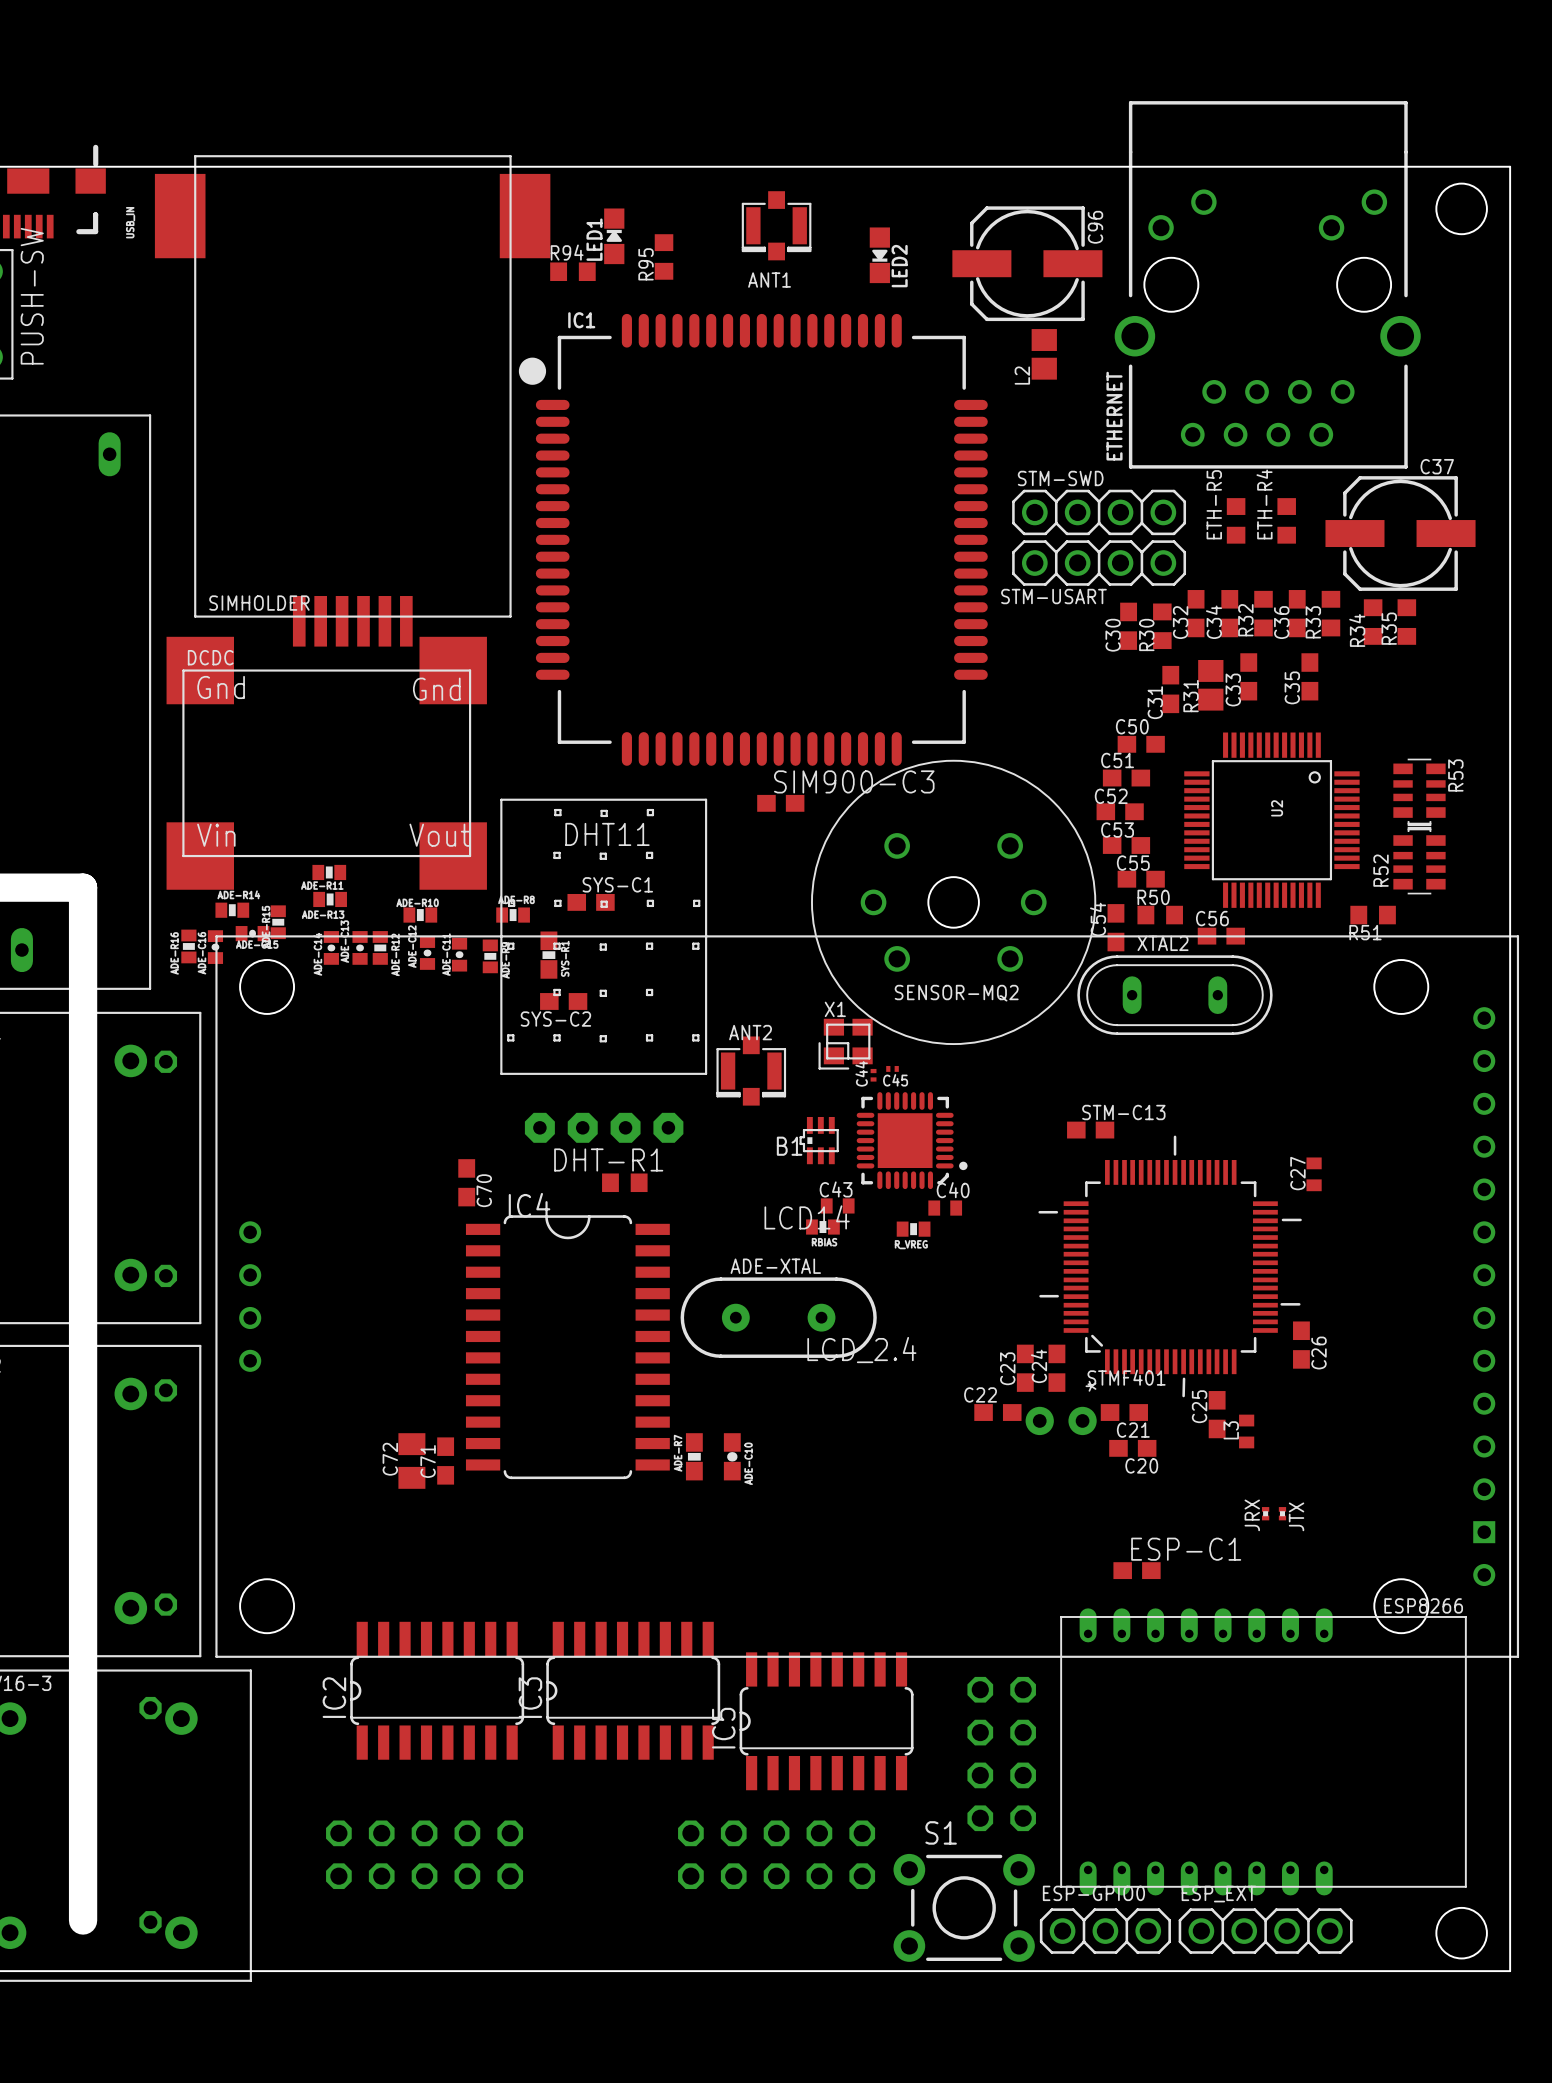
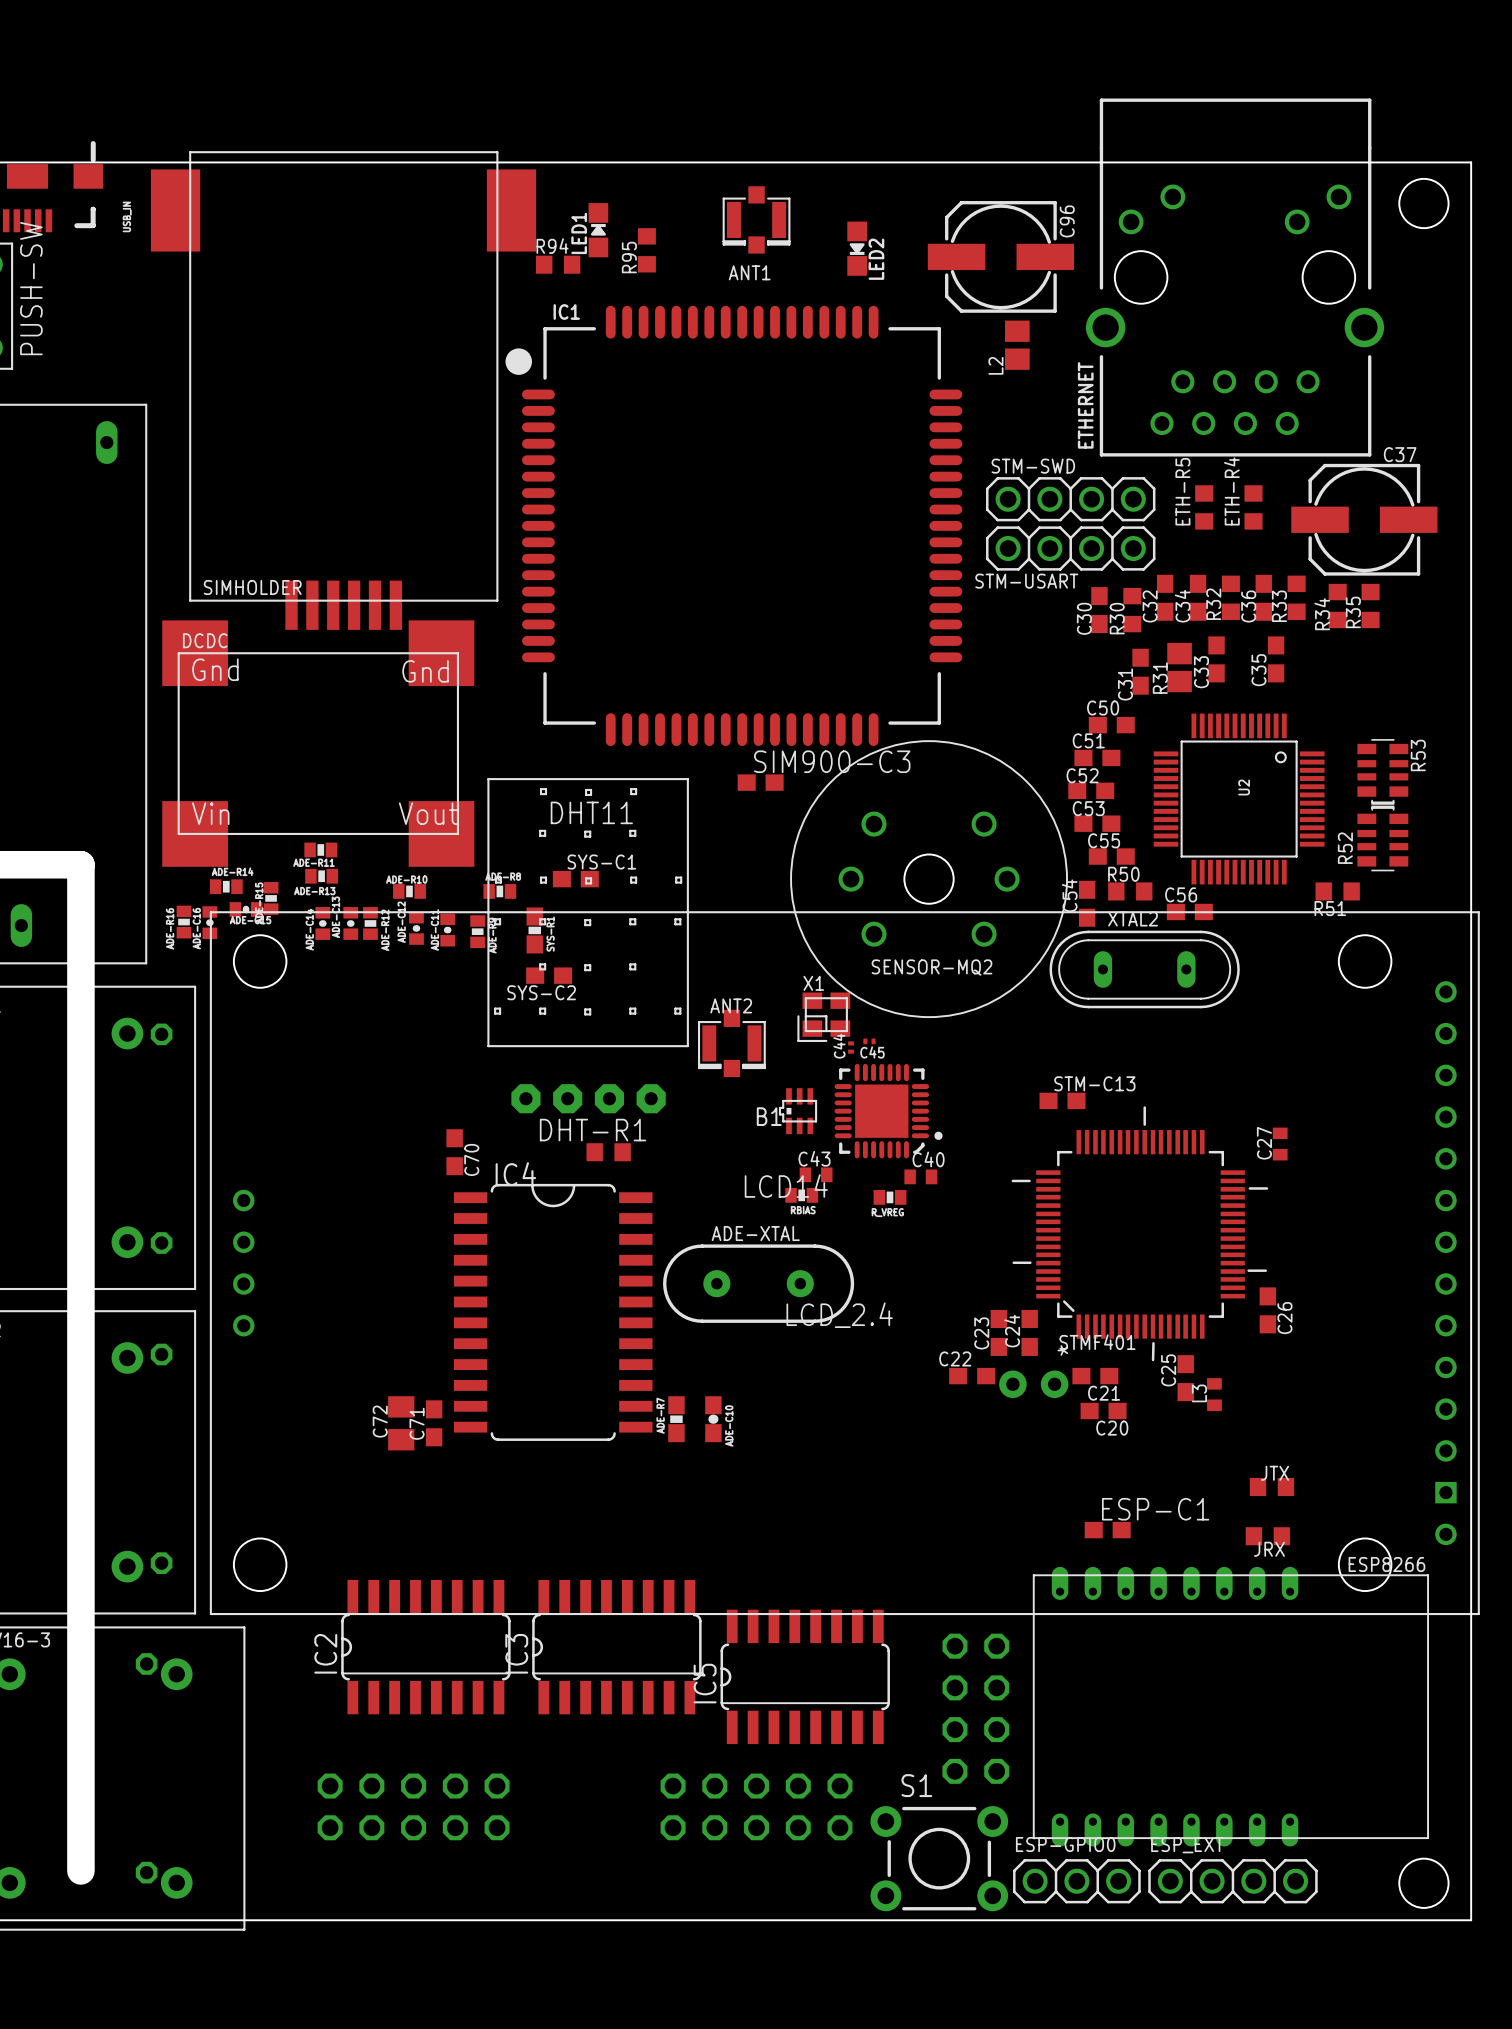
JRX: (1265, 1513) -> none
JTX: (1282, 1513) -> none
JTX: none -> (1271, 1486)
JRX: none -> (1267, 1536)

